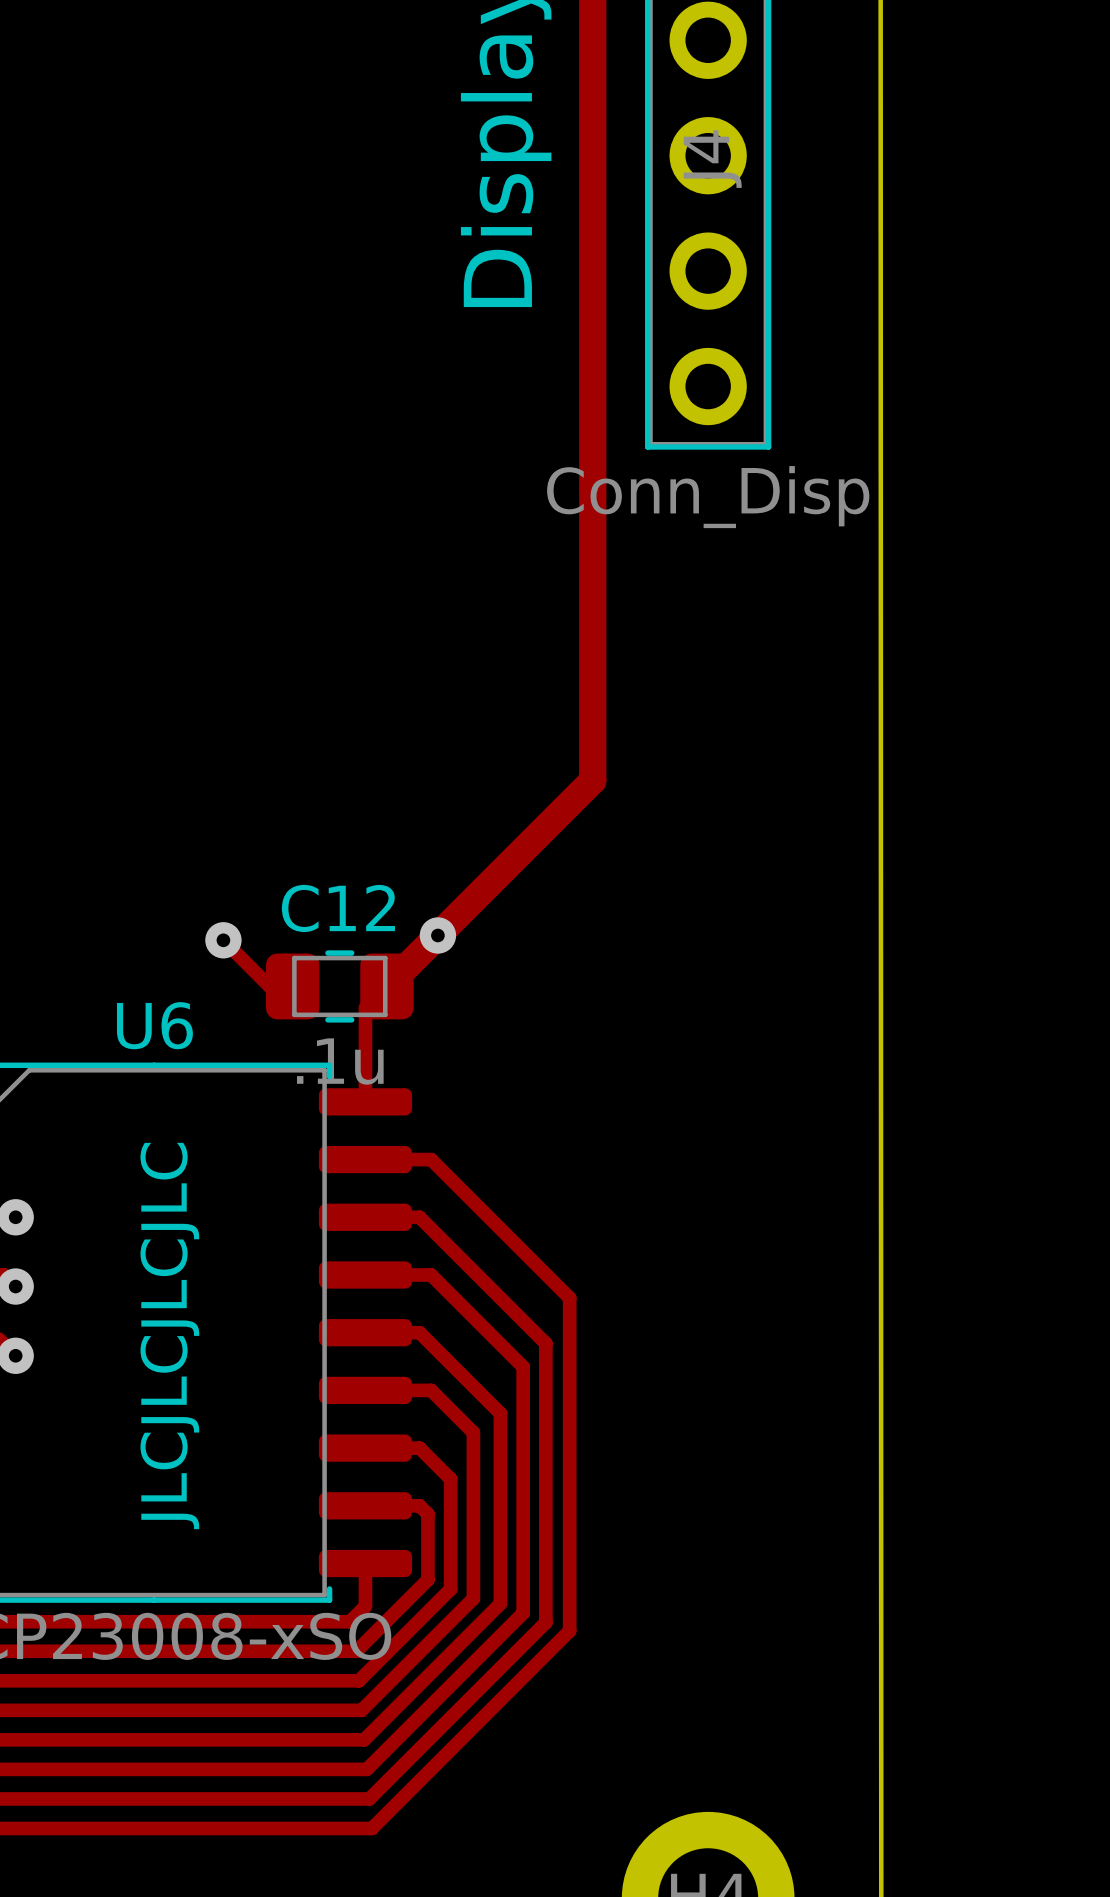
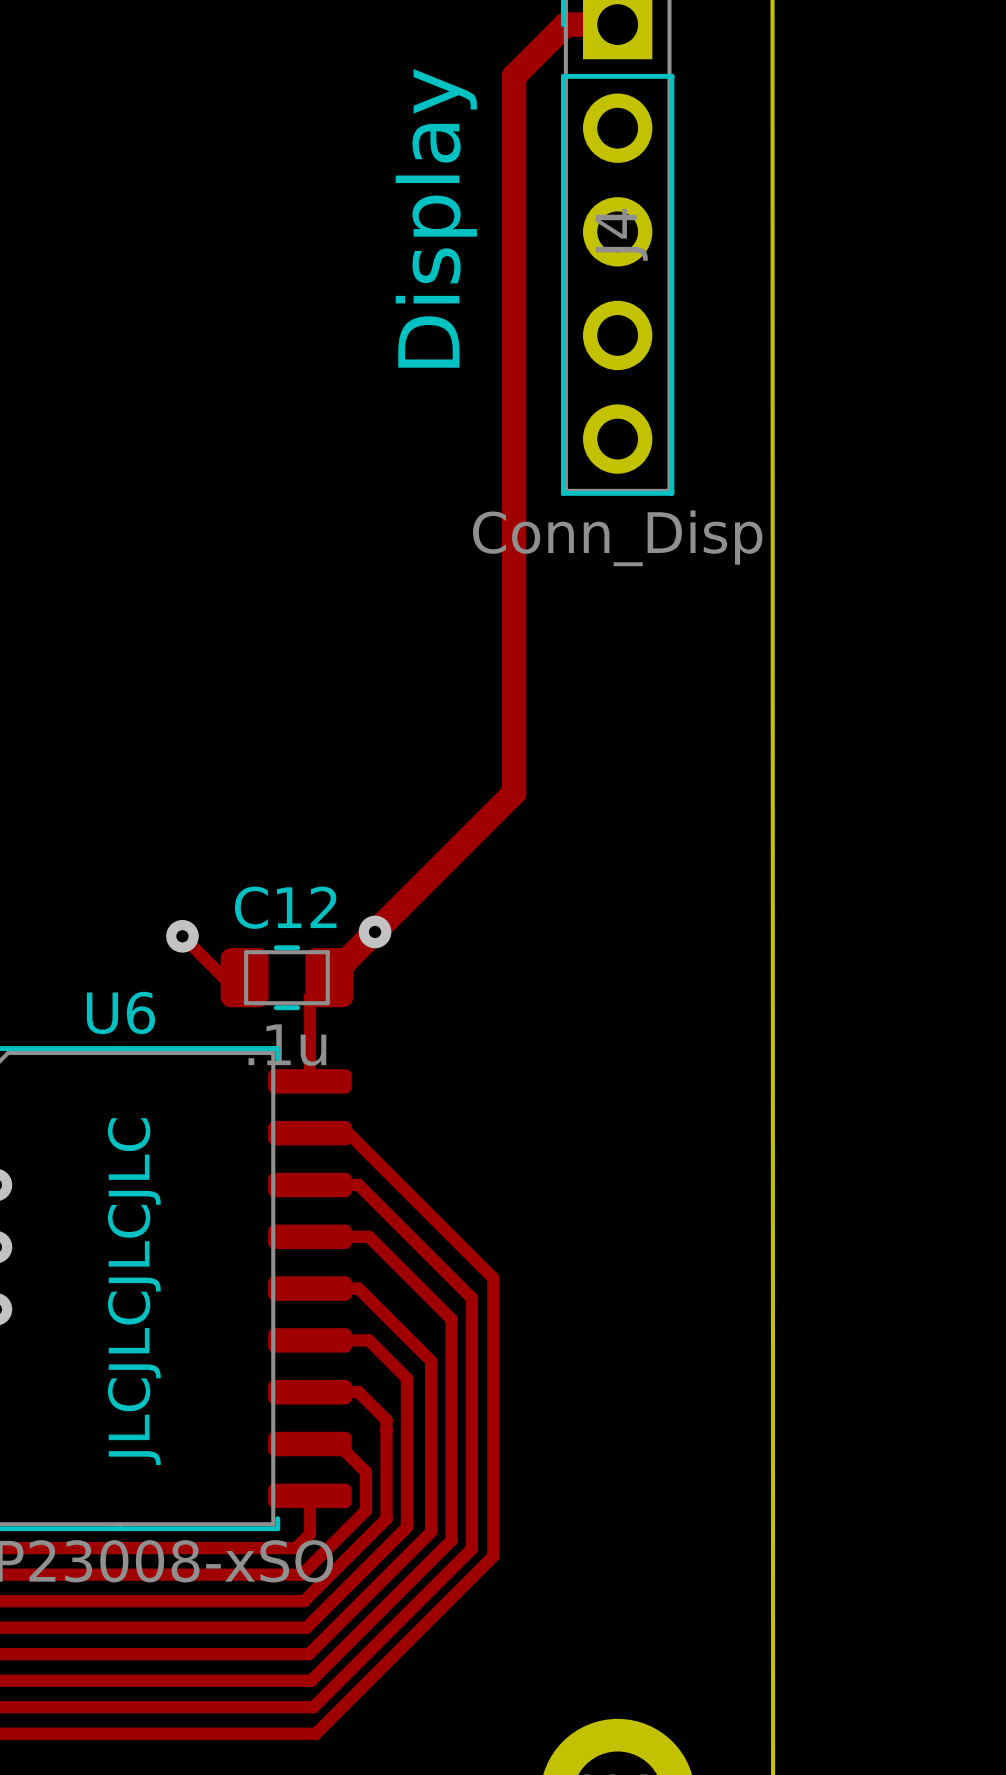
track: (408, 1159) (431, 1159) (569, 1298) (569, 1321) -> (348, 1133) (493, 1278)
track: (396, 1505) (419, 1505) (427, 1514) (427, 1537) -> (337, 1444) (366, 1472)

